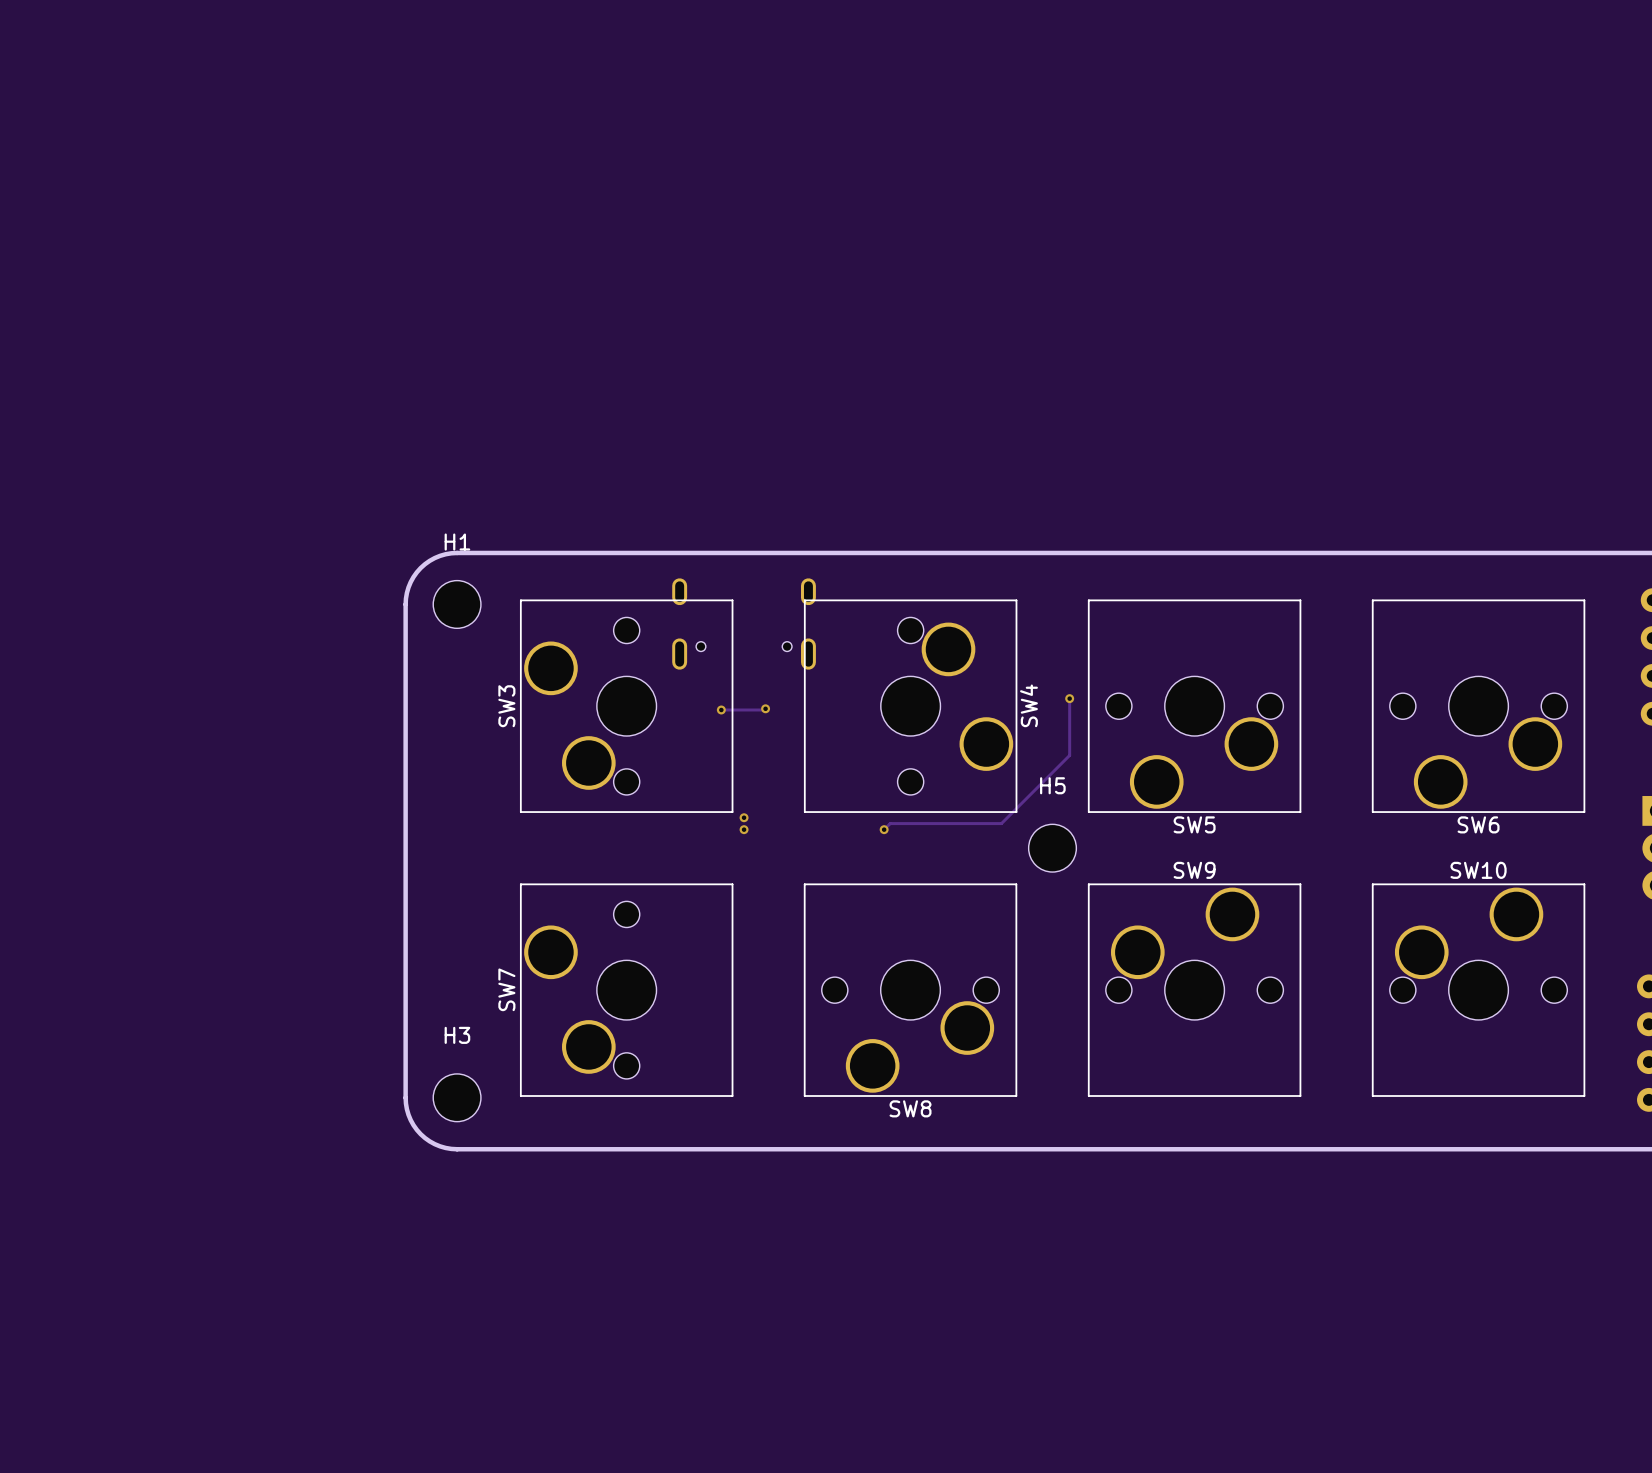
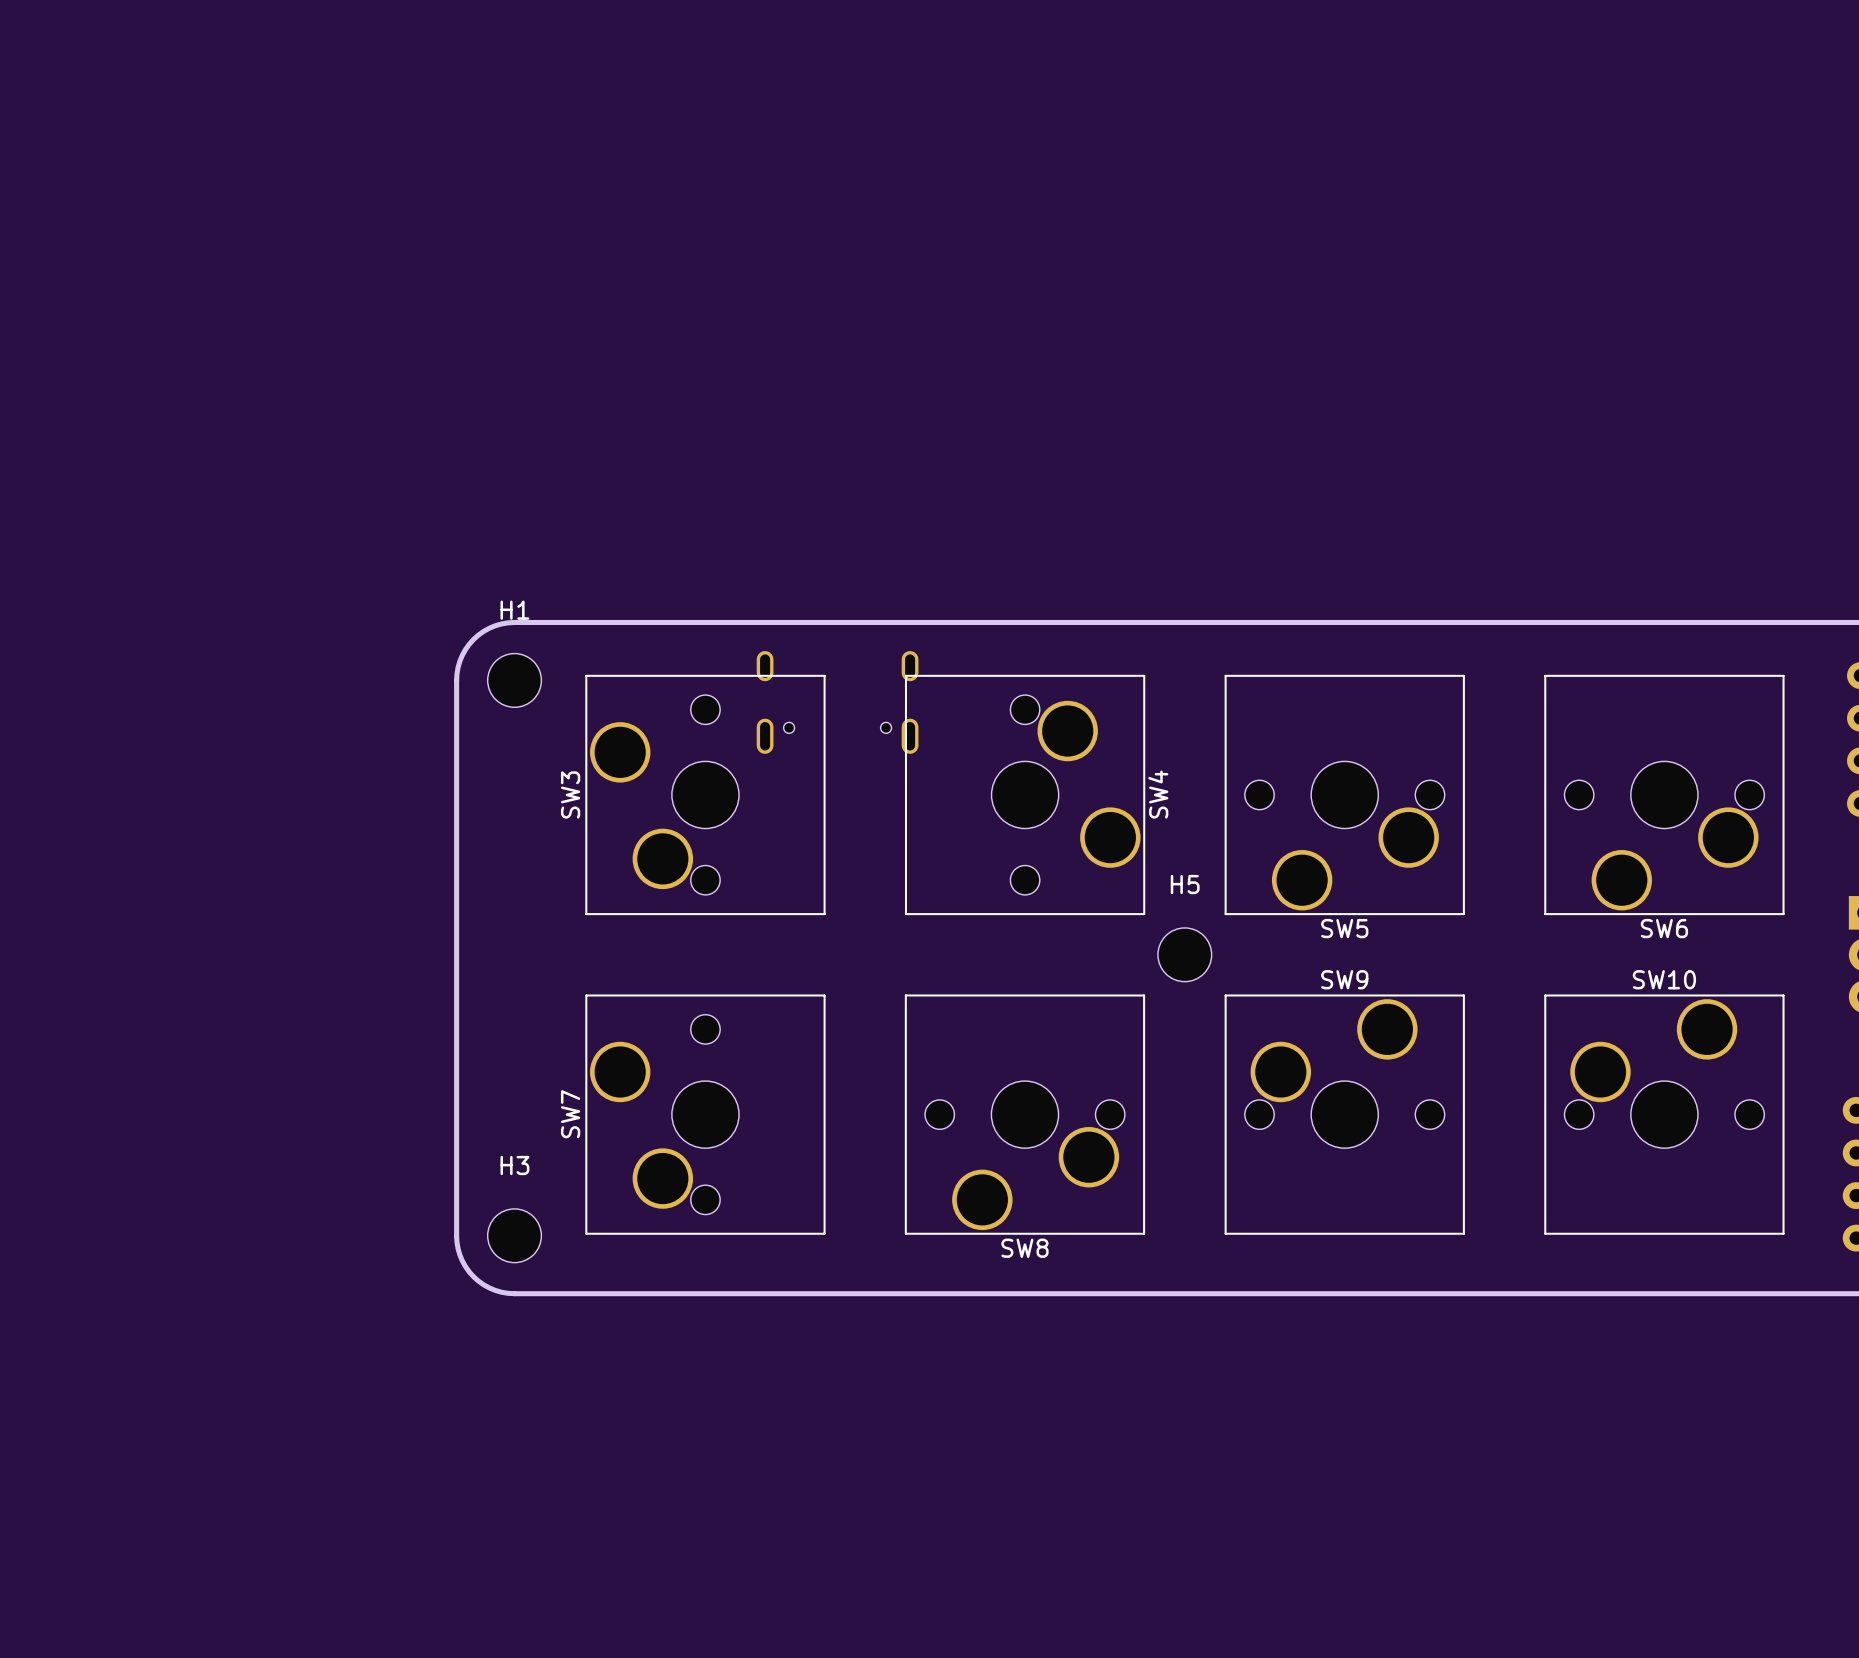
track: (1069, 698) (1069, 755) (1001, 823) (890, 823) (884, 829) -> none
via: (1069, 698) -> none
track: (765, 708) (721, 709) -> none
via: (765, 708) -> none
via: (721, 709) -> none
via: (744, 817) -> none
via: (744, 829) -> none
via: (884, 829) -> none

